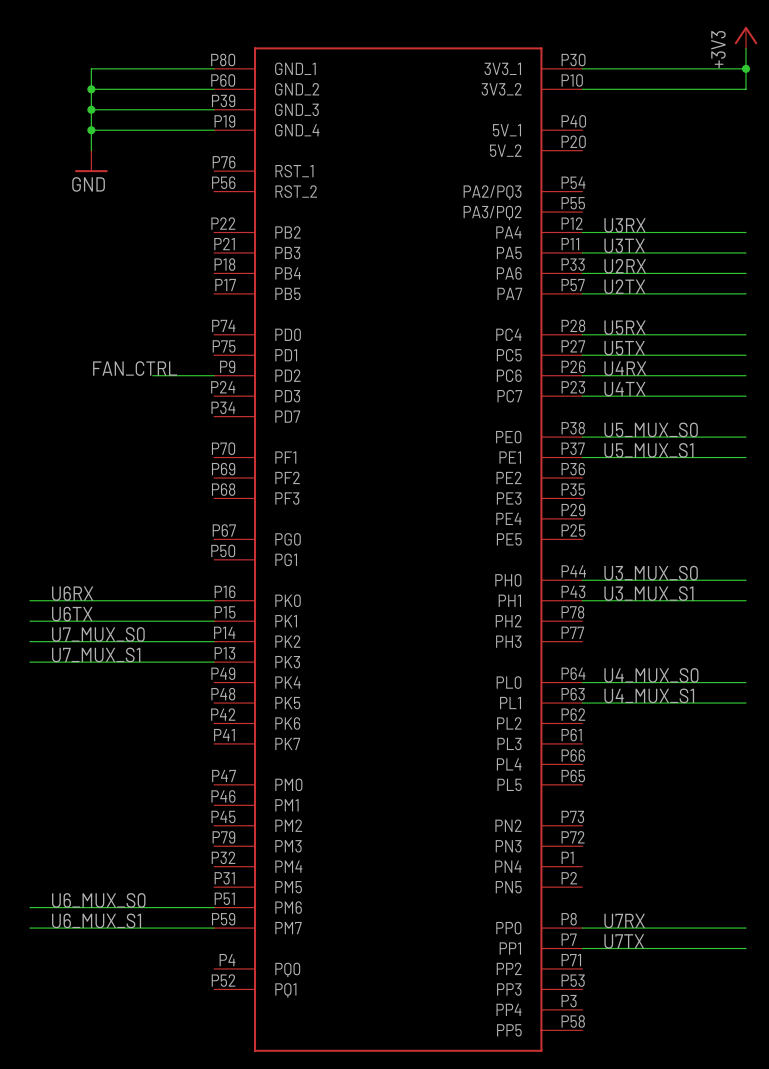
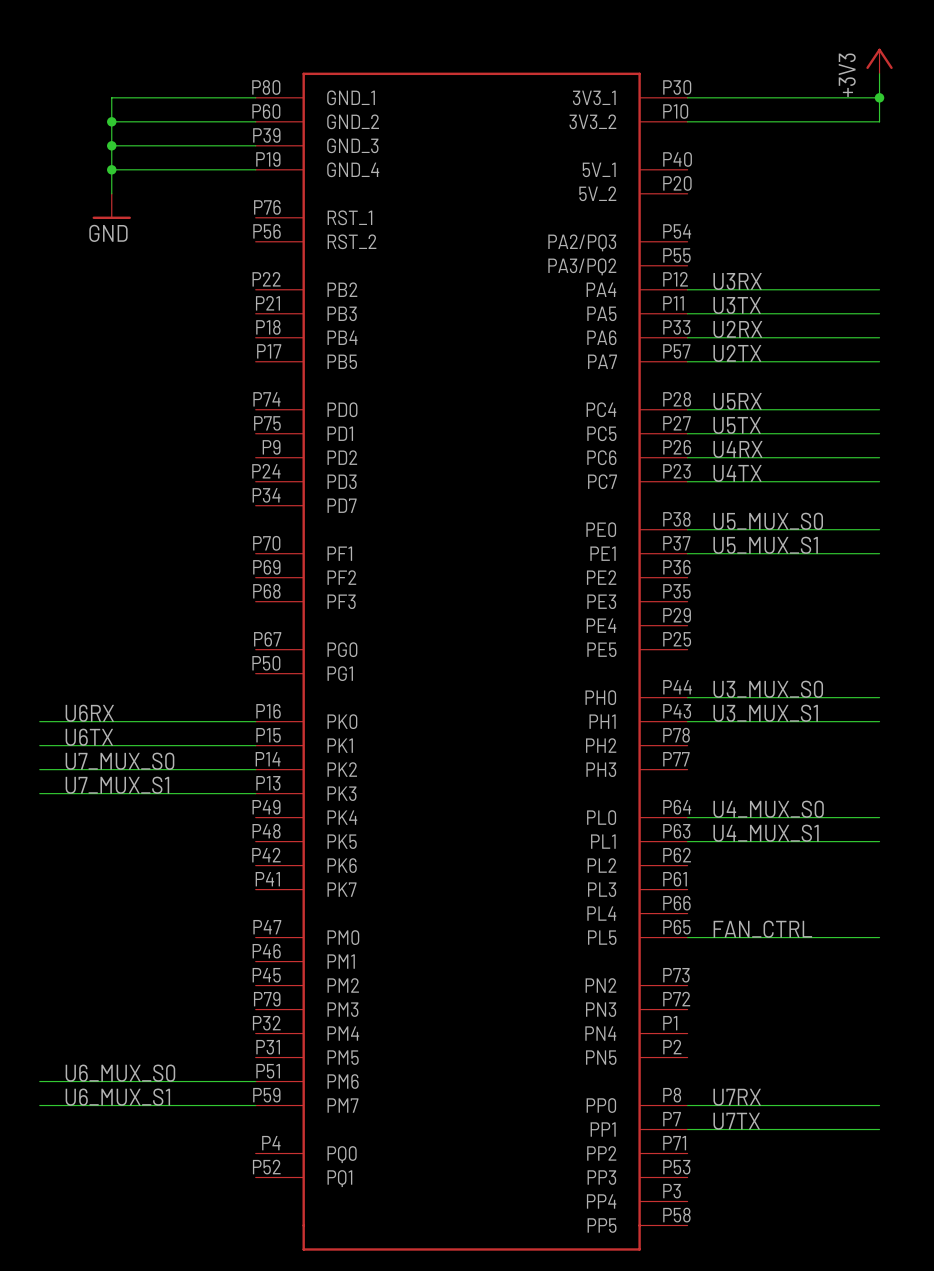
label: FAN_CTRL (135, 368) -> none
wire: (152, 375) (214, 375) -> none
label: none -> FAN_CTRL (762, 929)
wire: none -> (687, 937) (879, 937)

